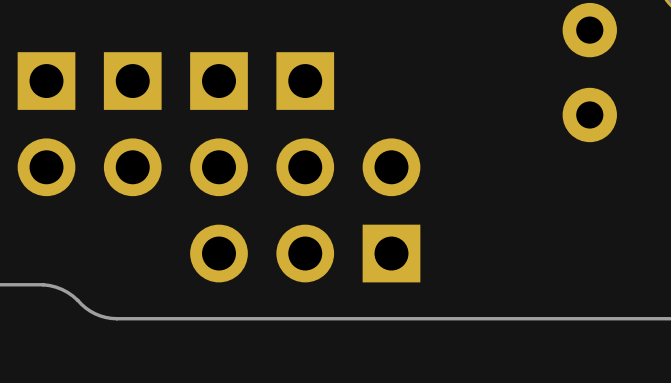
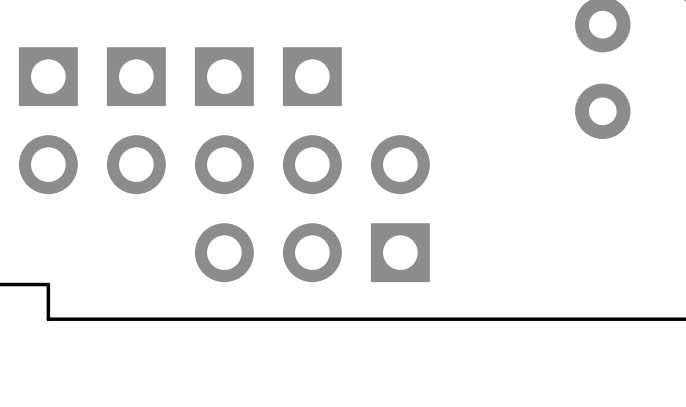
board edge: (43, 284) (55, 287) (67, 292) (95, 313) (116, 318) -> (44, 284) (48, 284) (48, 319) (120, 319)

